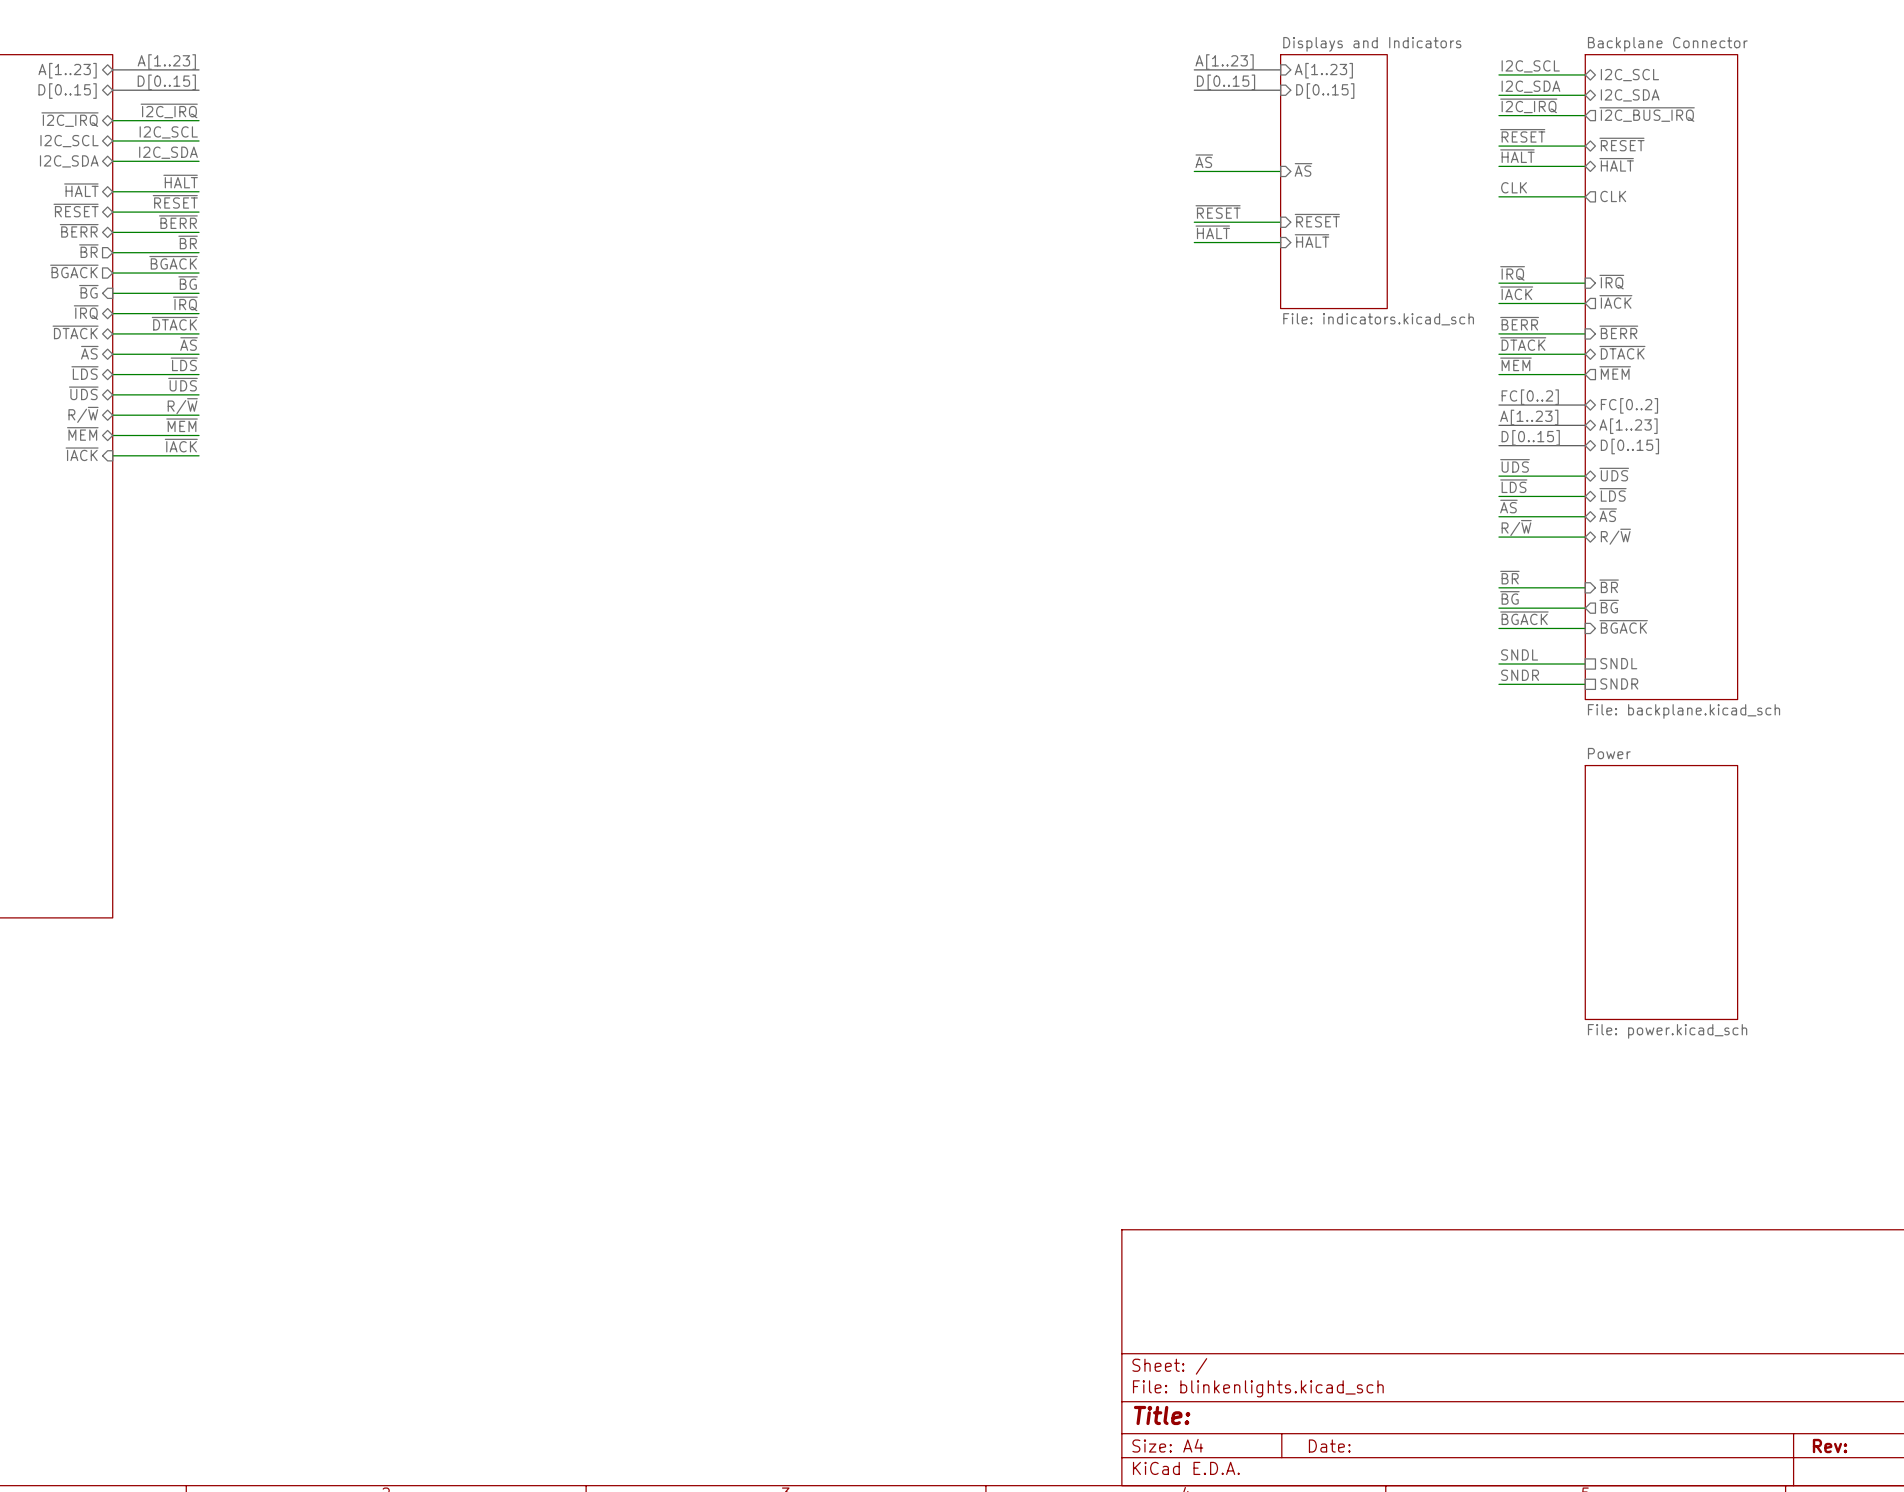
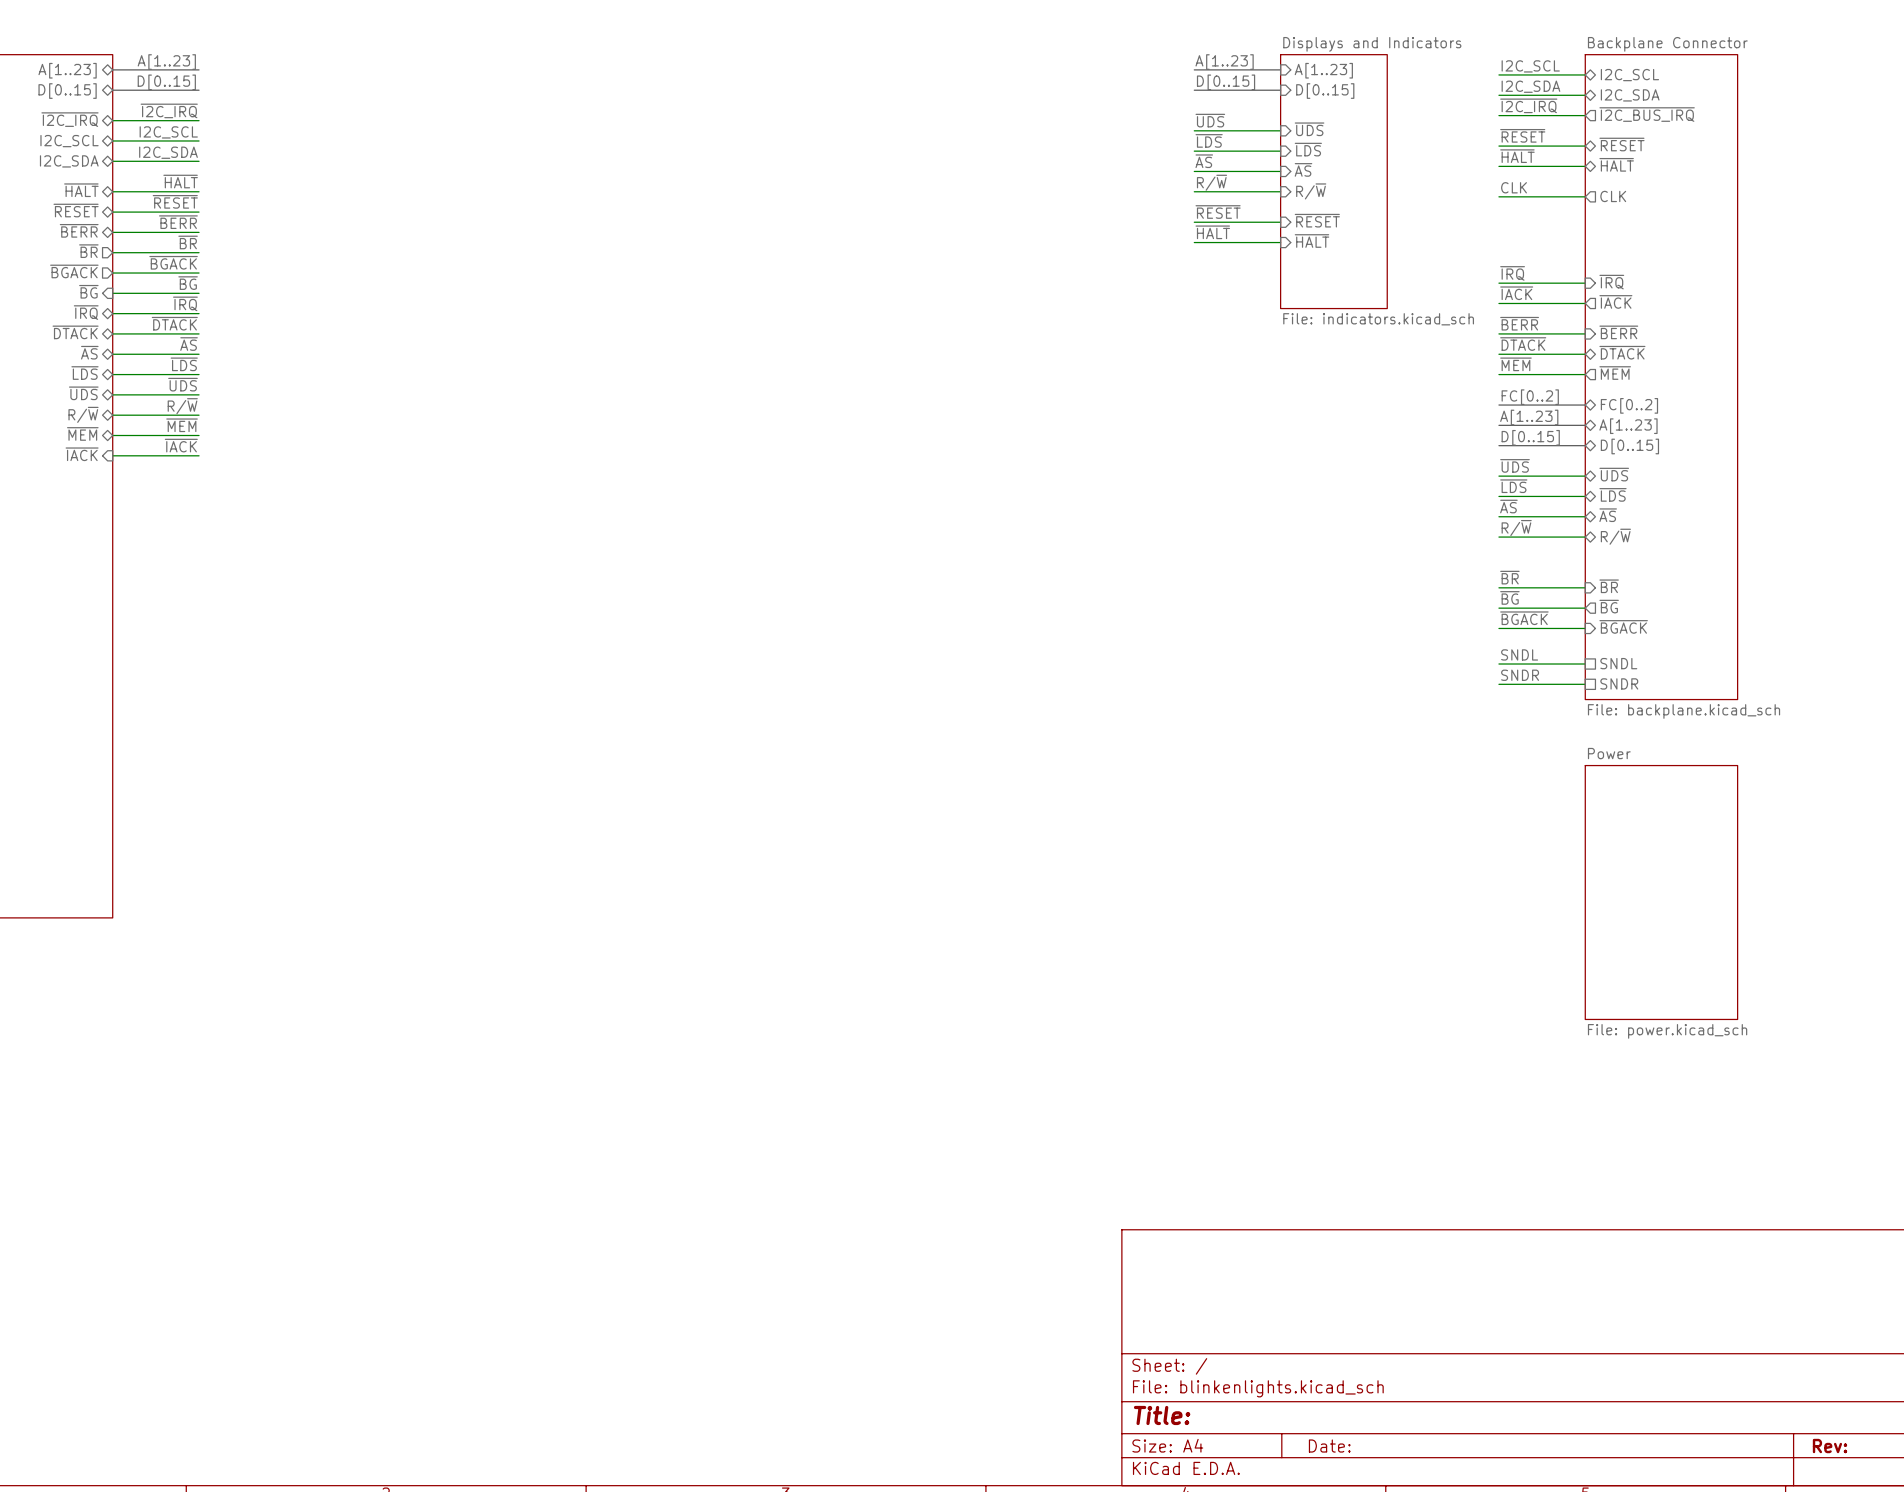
label: none -> ~{UDS} (1210, 120)
sheet pin: none -> ~{UDS} (1309, 129)
wire: none -> (1194, 130) (1280, 130)
label: none -> ~{LDS} (1209, 140)
sheet pin: none -> ~{LDS} (1308, 149)
wire: none -> (1194, 151) (1280, 151)
label: none -> R/~{W} (1211, 182)
wire: none -> (1194, 191) (1280, 191)
sheet pin: none -> R/~{W} (1311, 191)

